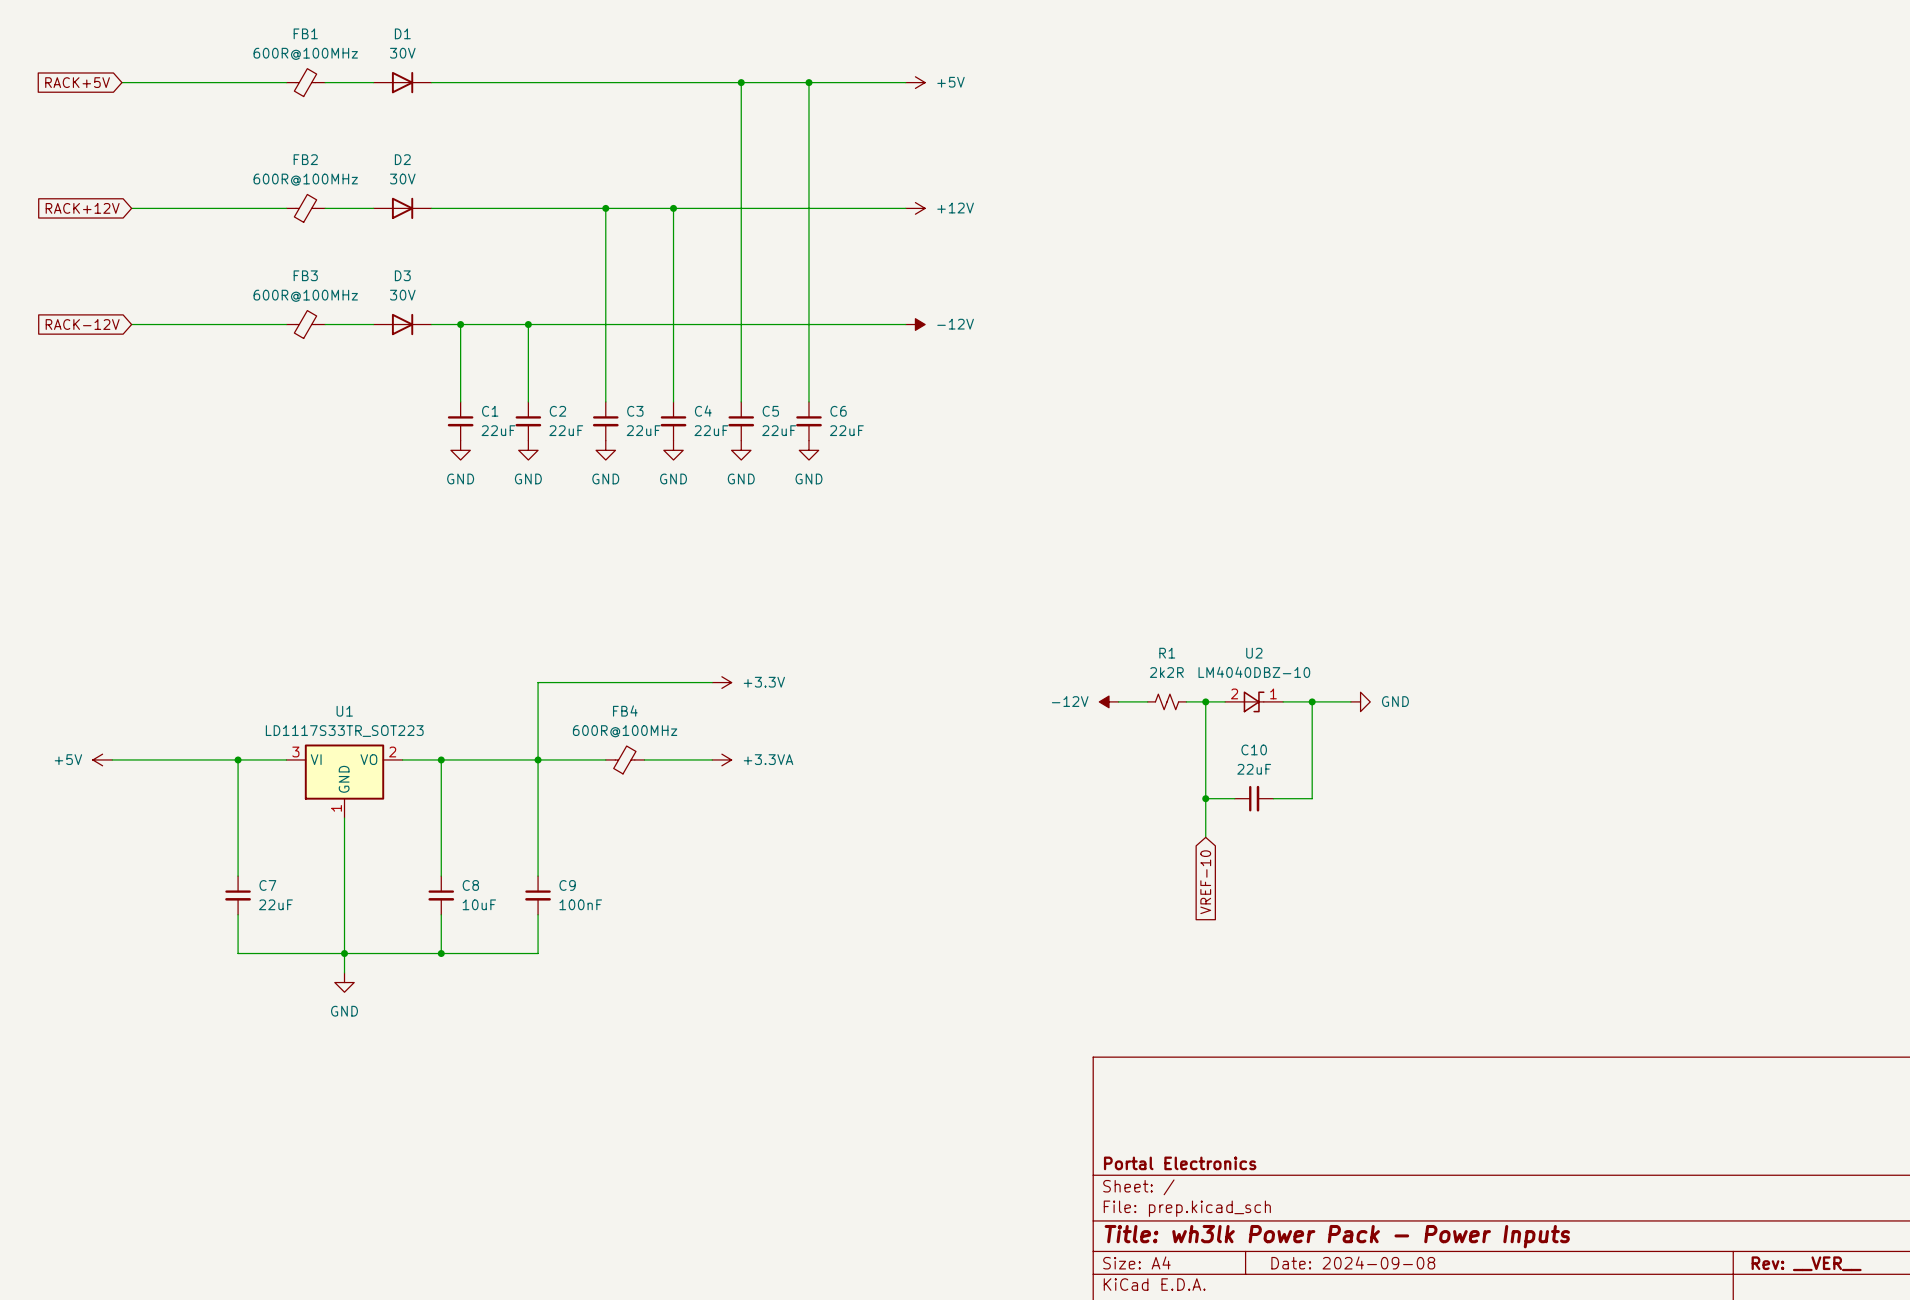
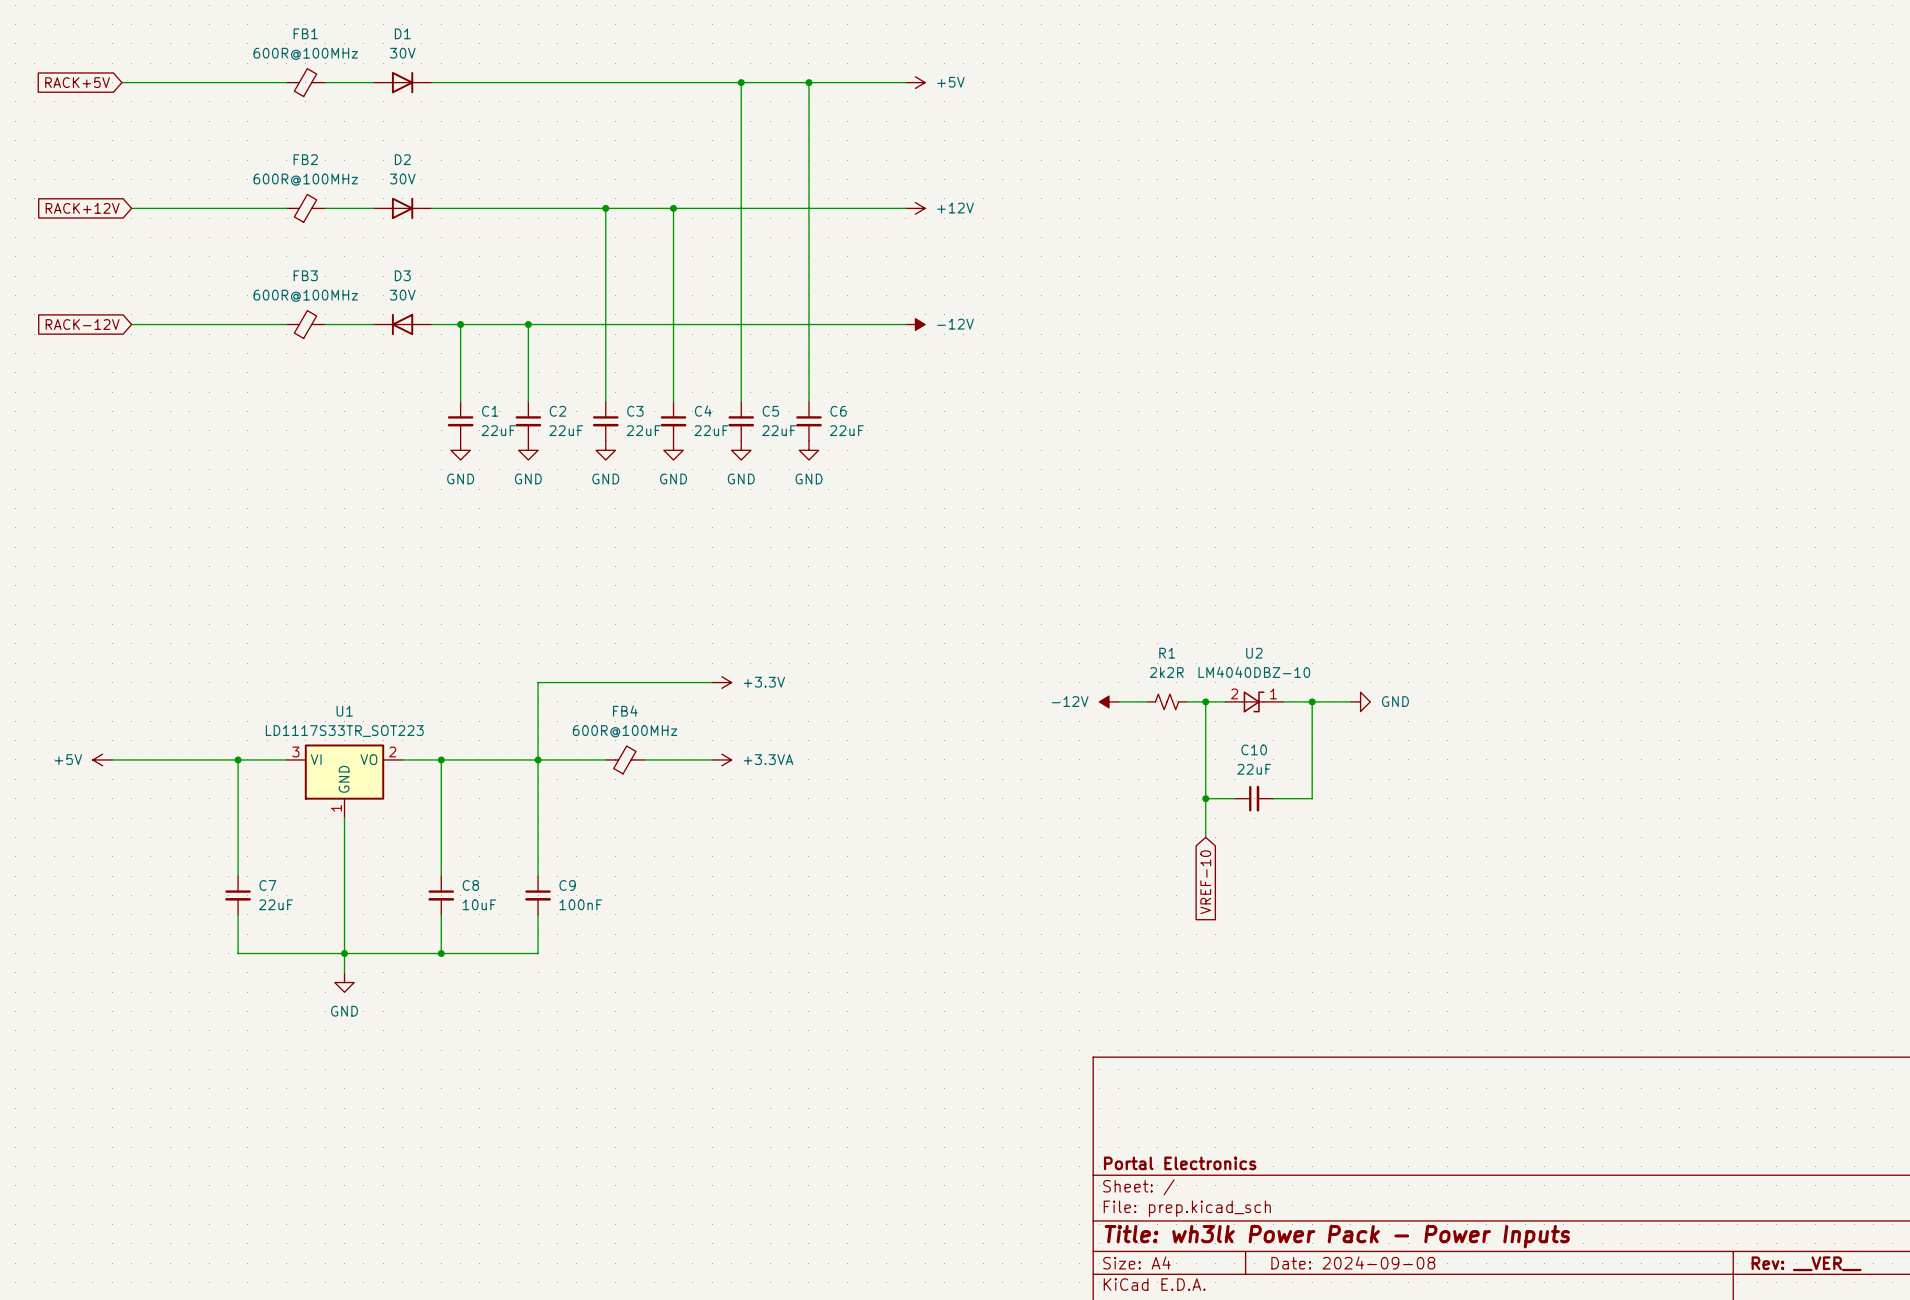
D3 rotation: 0° (402, 324) -> 180° (402, 324)

